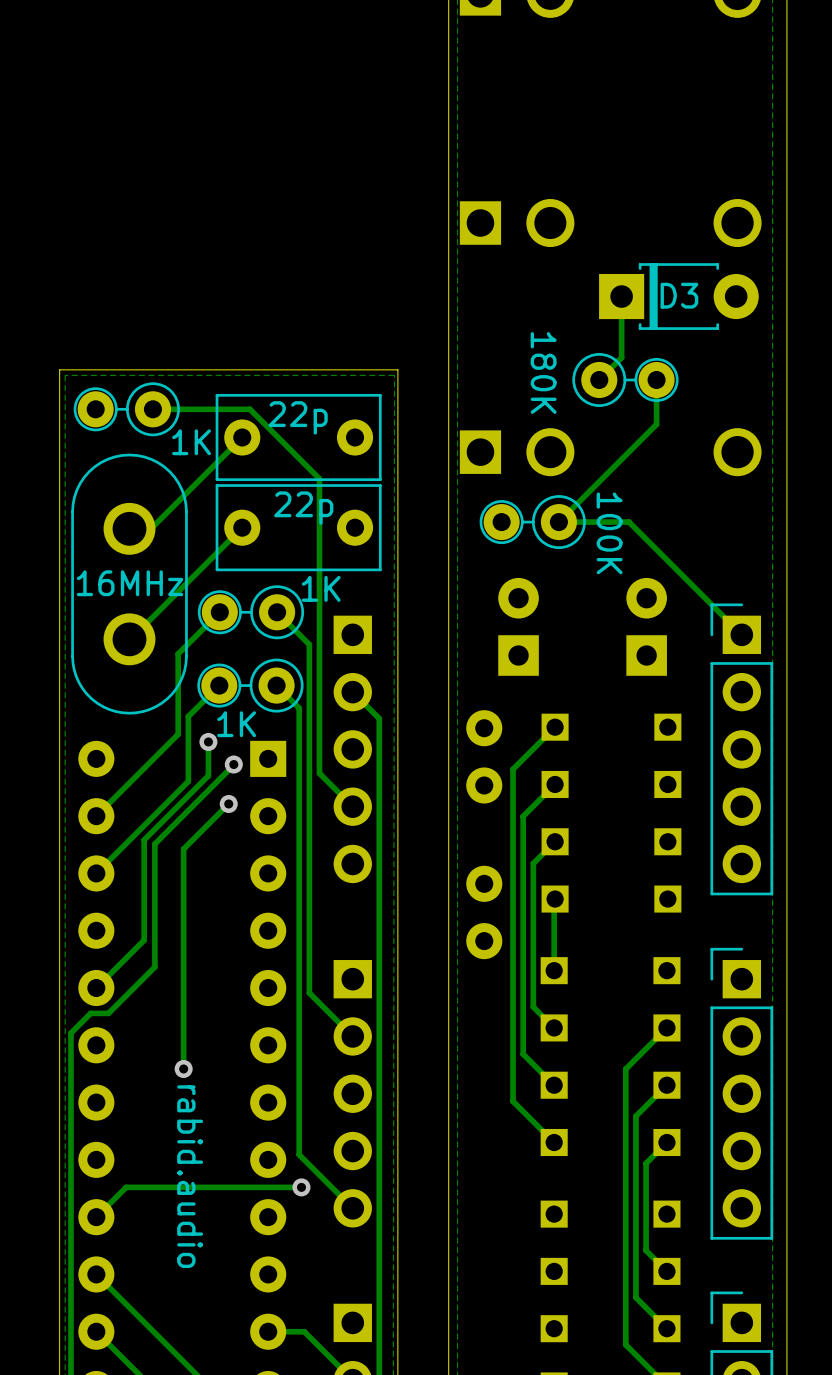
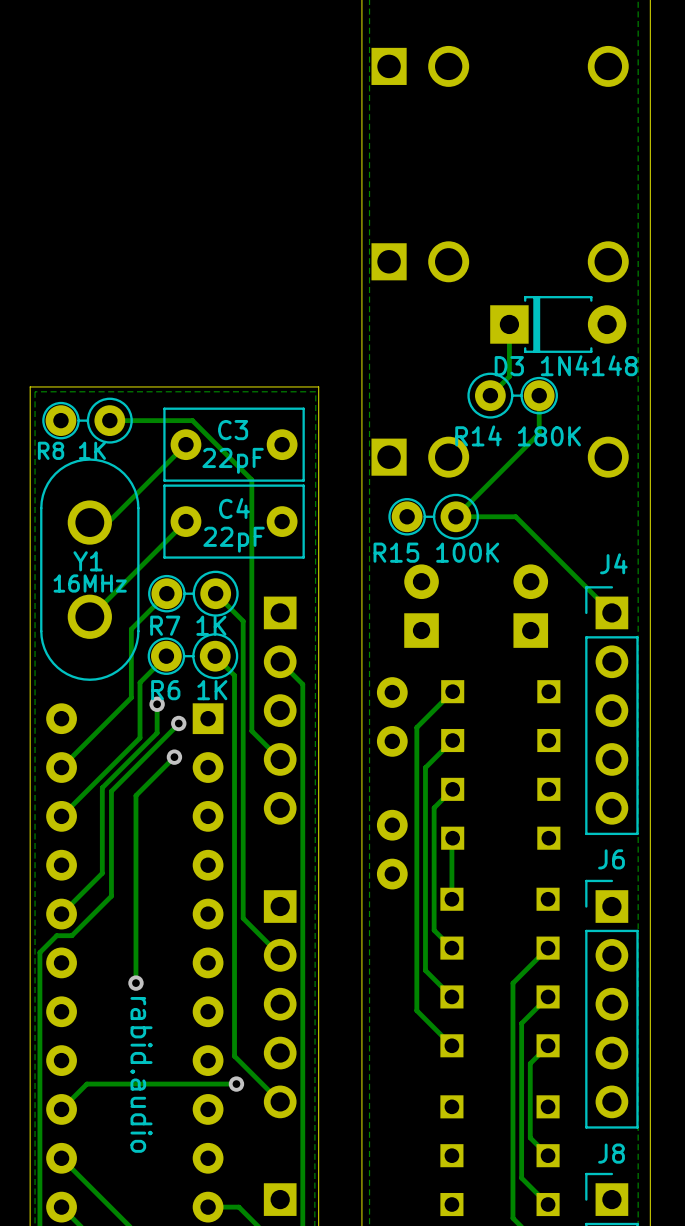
D3 name: D3 (679, 295) -> none
text: none -> D3 1N4148 (566, 365)
part value: 180K (543, 372) -> none
part value: 22p (298, 417) -> none
text: none -> C3 (233, 430)
text: none -> R14 180K (518, 435)
part value: 1K (191, 442) -> none
text: none -> R8 1K (71, 450)
text: none -> 22pF (233, 460)
part value: 22p (303, 508) -> none
text: none -> C4 (234, 508)
part value: 100K (609, 533) -> none
text: none -> 22pF (234, 539)
text: none -> R15 100K (436, 552)
text: none -> Y1 (88, 561)
text: none -> J4 (613, 563)
part value: 16MHz (130, 583) -> none
part value: 1K (321, 588) -> none
text: none -> 16MHz (90, 583)
text: none -> R7 1K (188, 625)
part value: 1K (236, 724) -> none
text: none -> R6 1K (189, 690)
text: none -> J6 (611, 859)
text: none -> J8 (611, 1153)

